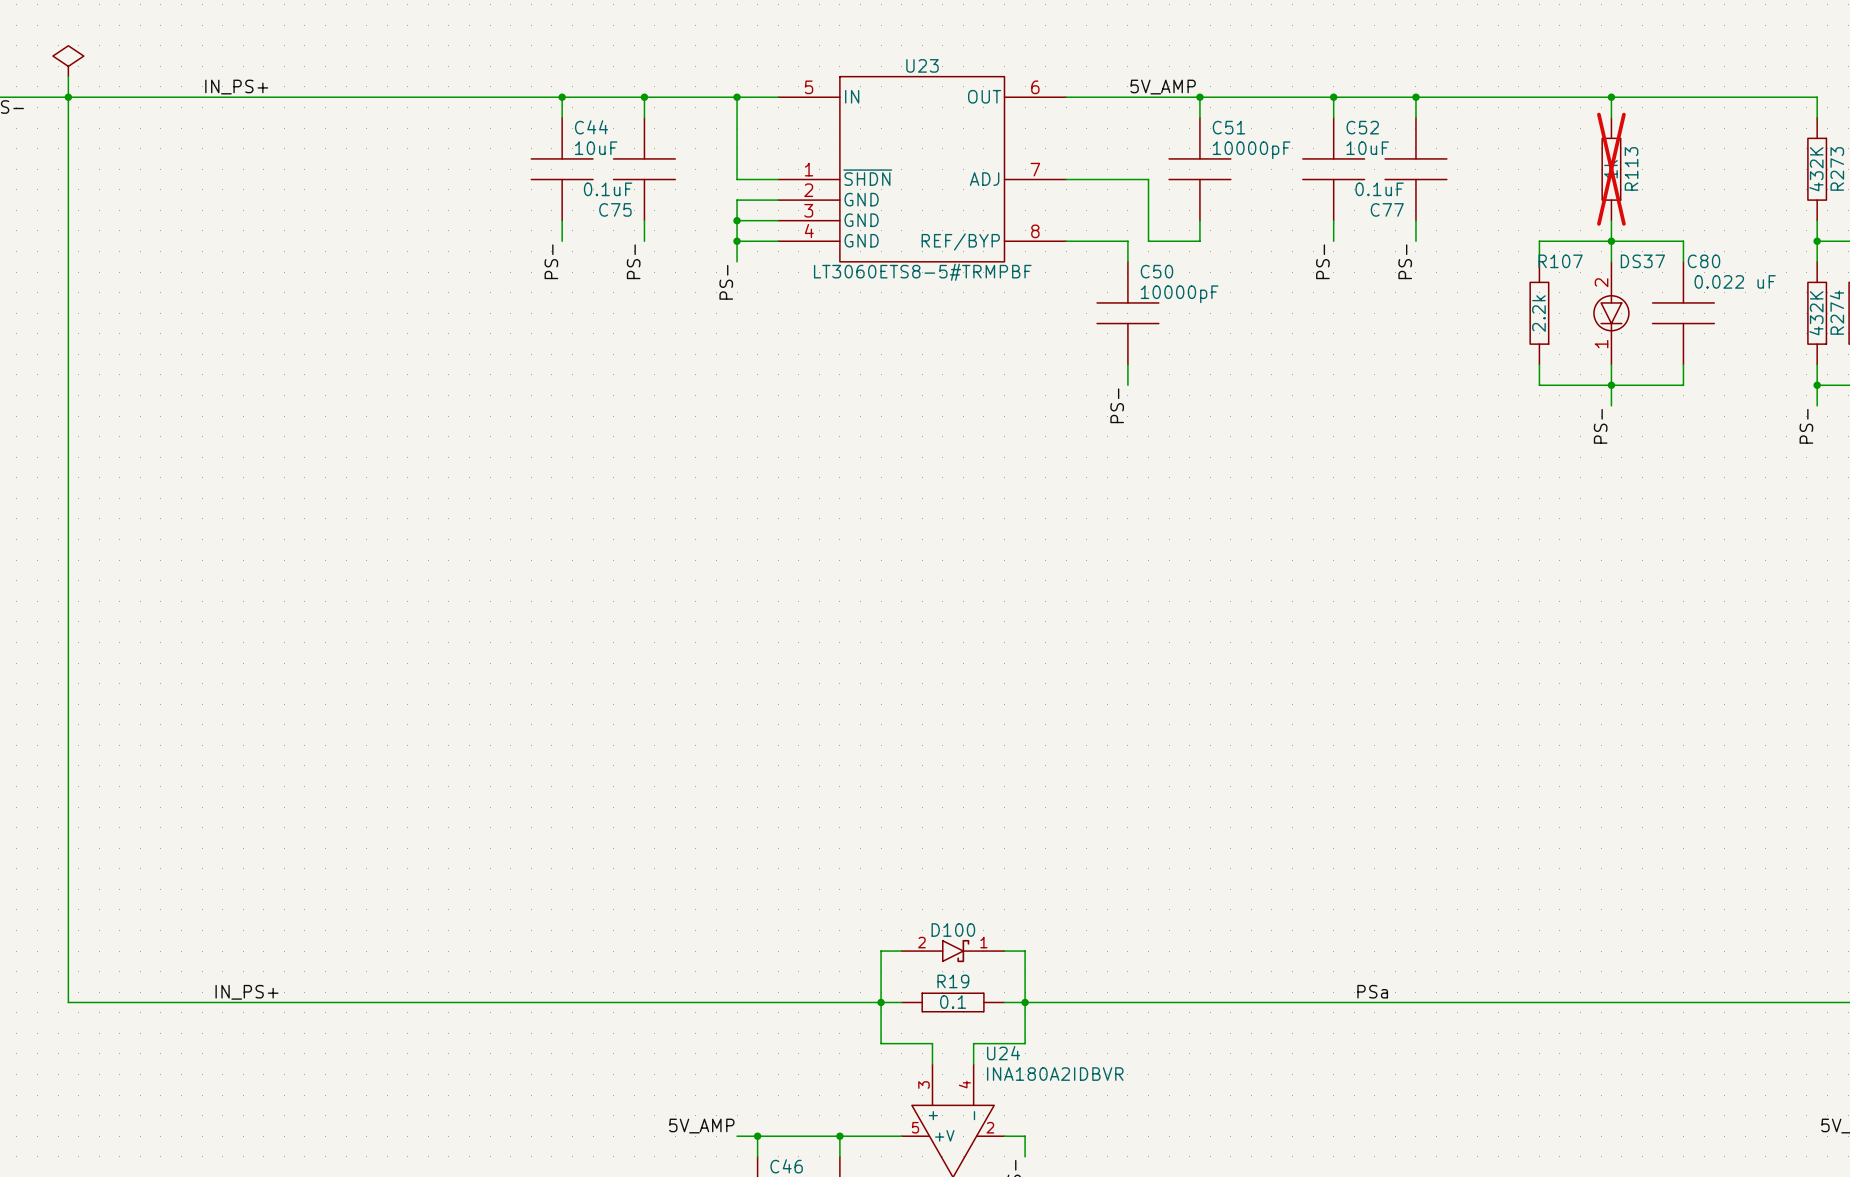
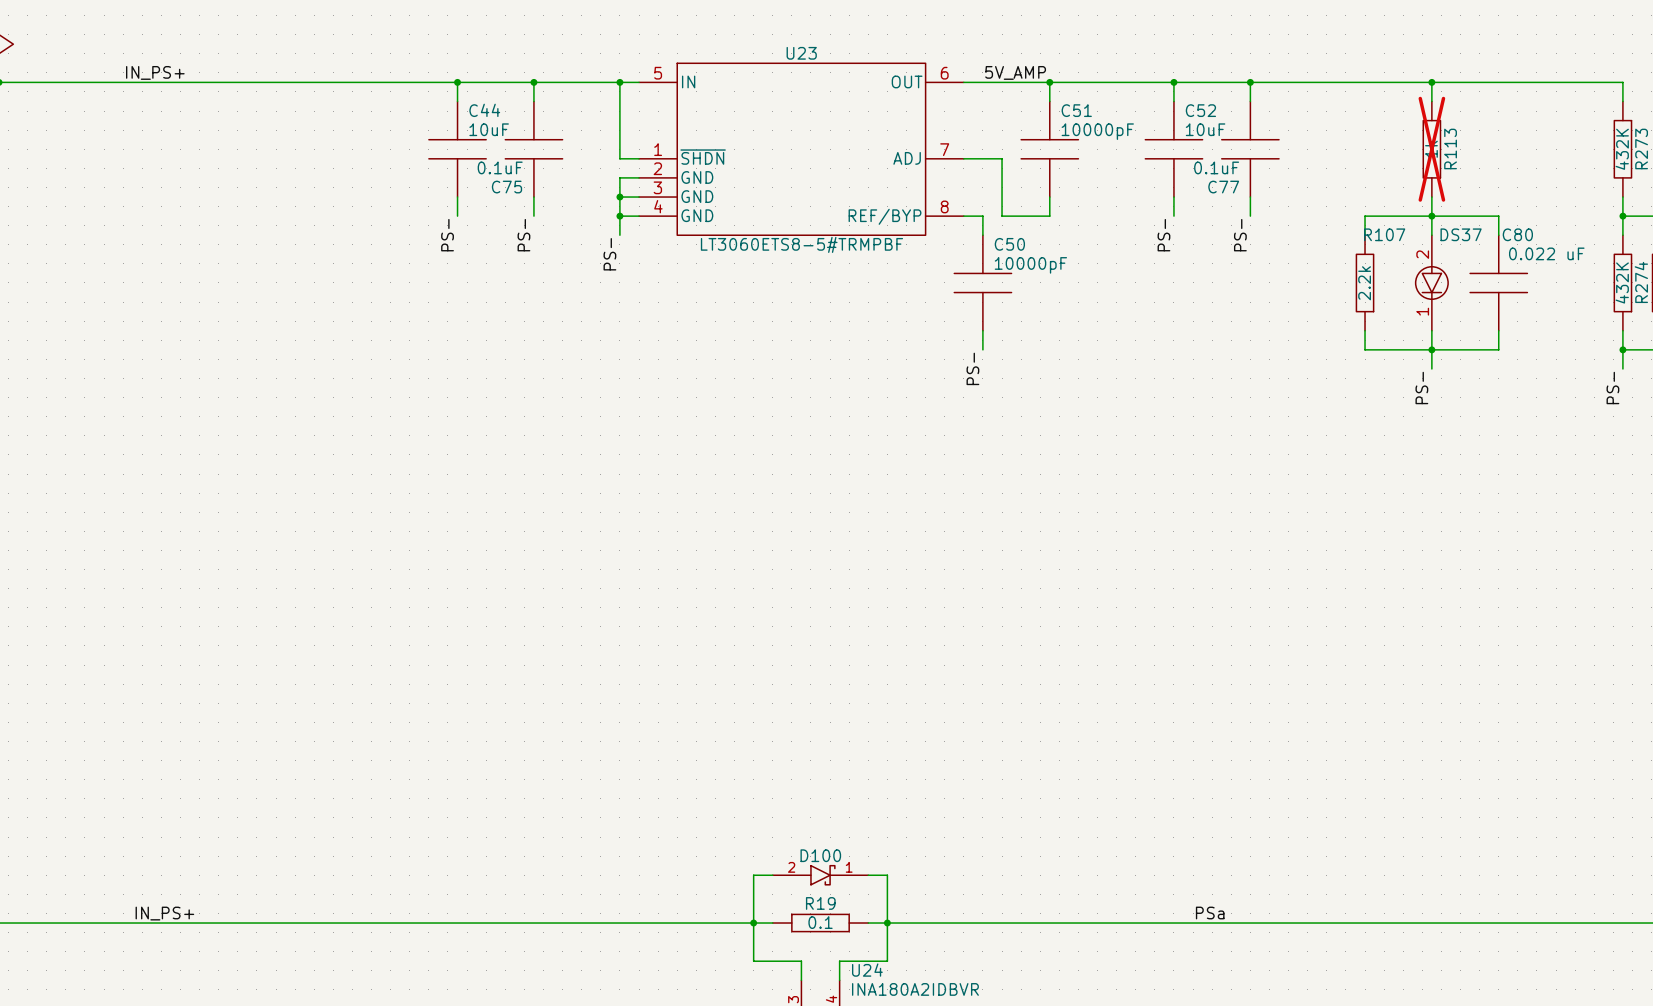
U23 symbol: [778, 76, 1067, 262] -> [639, 63, 964, 236]

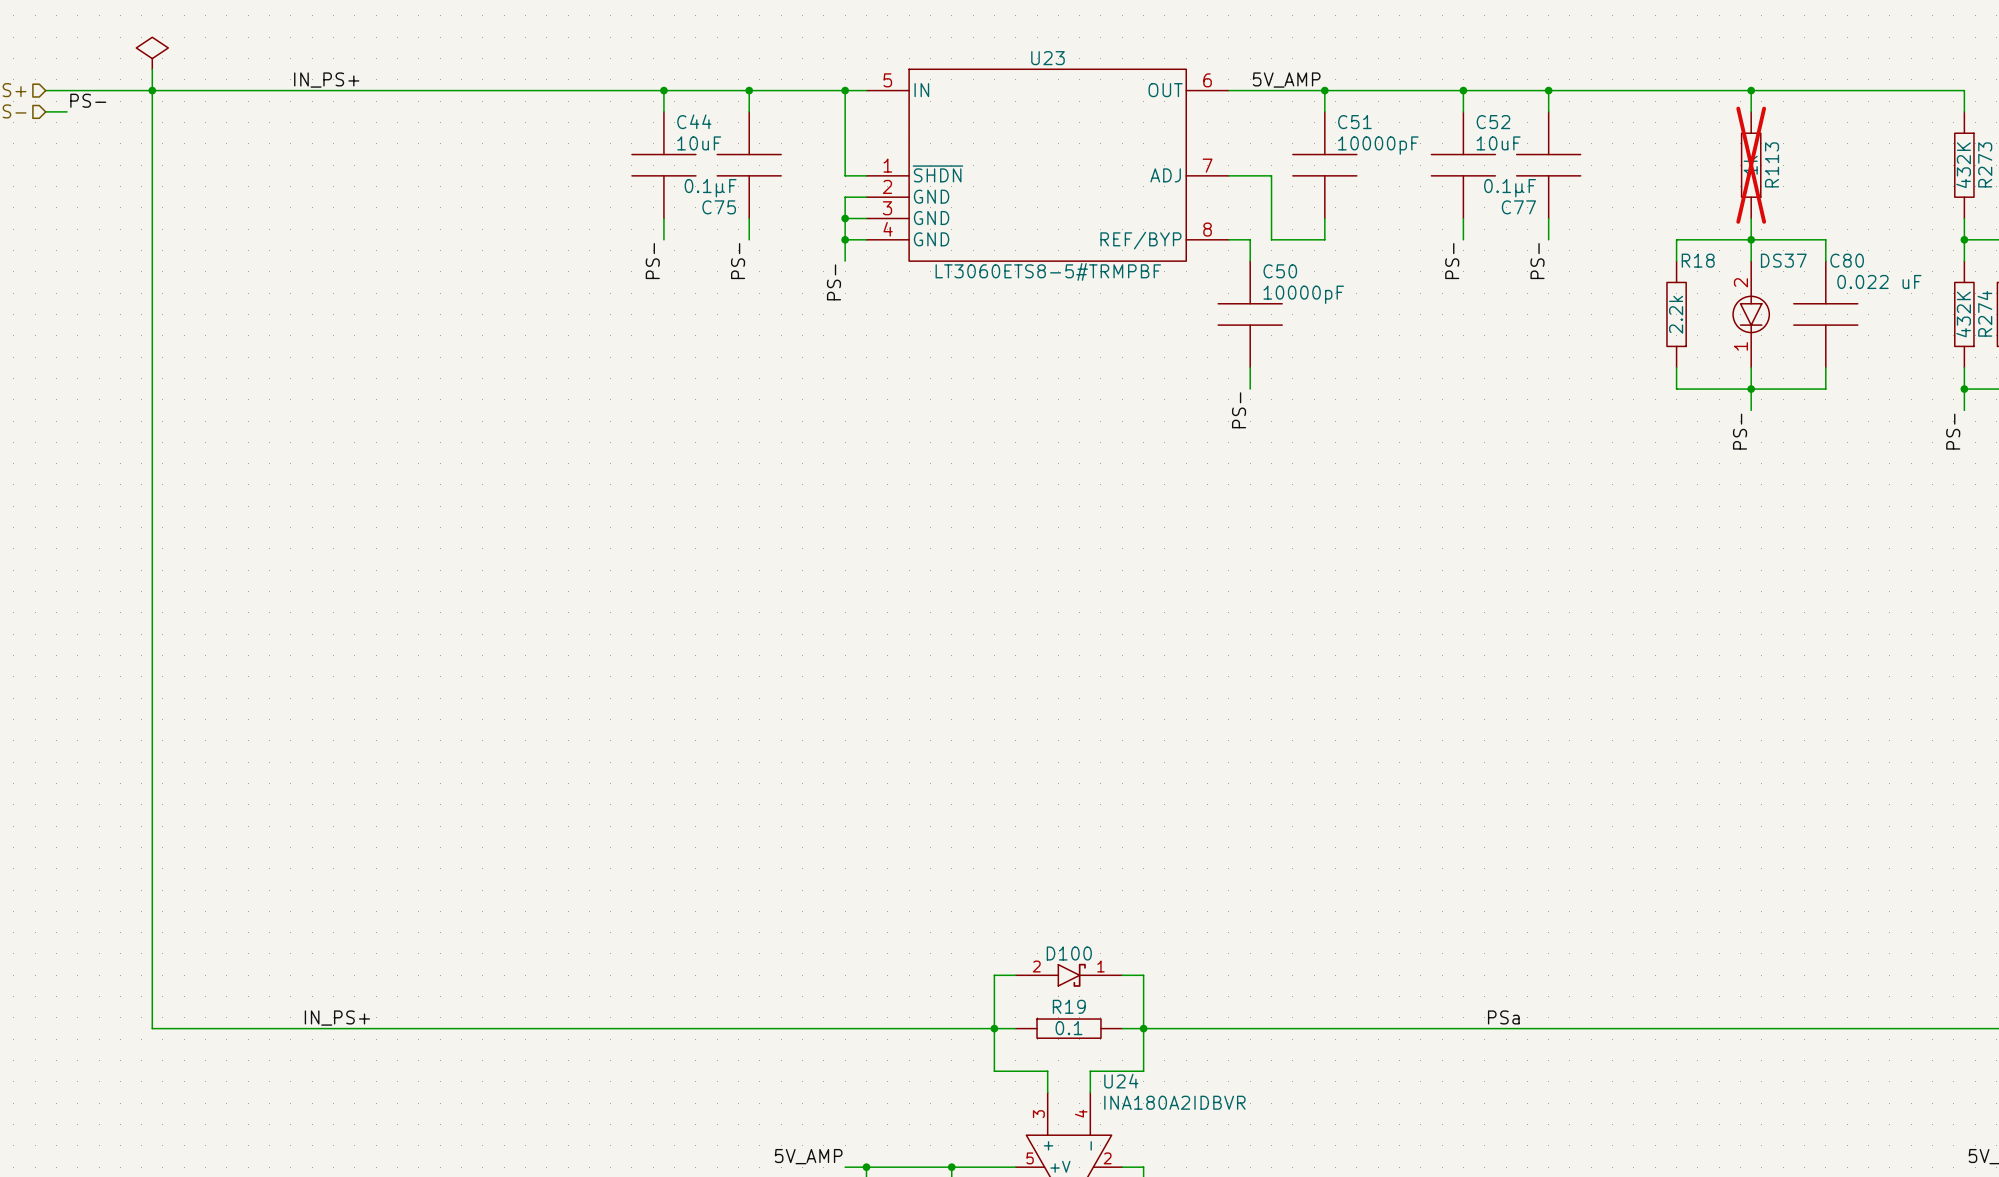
C75 text: 0.1uF (500, 167) -> 0.1µF (710, 188)
C77 text: 0.1uF (1216, 167) -> 0.1µF (1510, 188)
R107 name: R107 (1384, 234) -> R18 (1698, 260)

